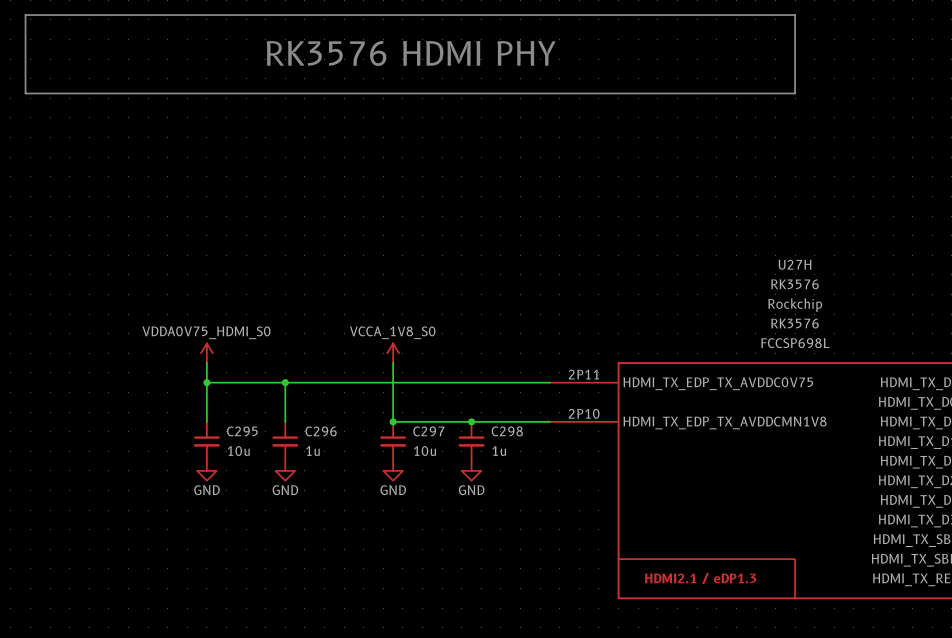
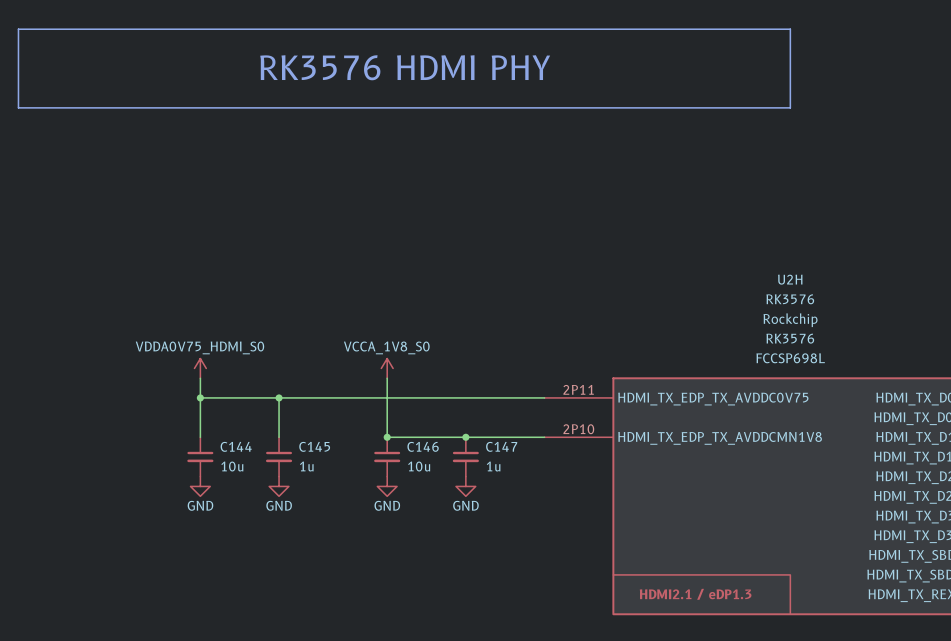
U27H name: U27H (794, 264) -> U2H (790, 279)
C295 name: C295 (242, 431) -> C144 (236, 446)
C296 name: C296 (321, 431) -> C145 (314, 446)
C297 name: C297 (428, 431) -> C146 (423, 446)
C298 name: C298 (507, 431) -> C147 (501, 446)

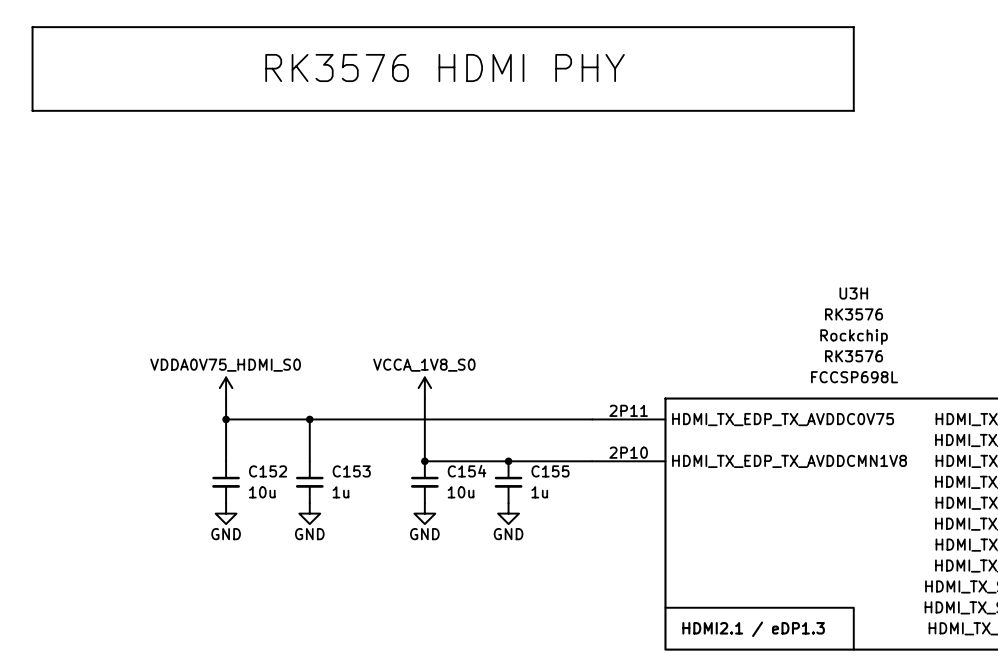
U2H name: U2H (790, 279) -> U3H (853, 293)
C144 name: C144 (236, 446) -> C152 (268, 471)
C145 name: C145 (314, 446) -> C153 (351, 471)
C146 name: C146 (423, 446) -> C154 (467, 471)
C147 name: C147 (501, 446) -> C155 (550, 471)

